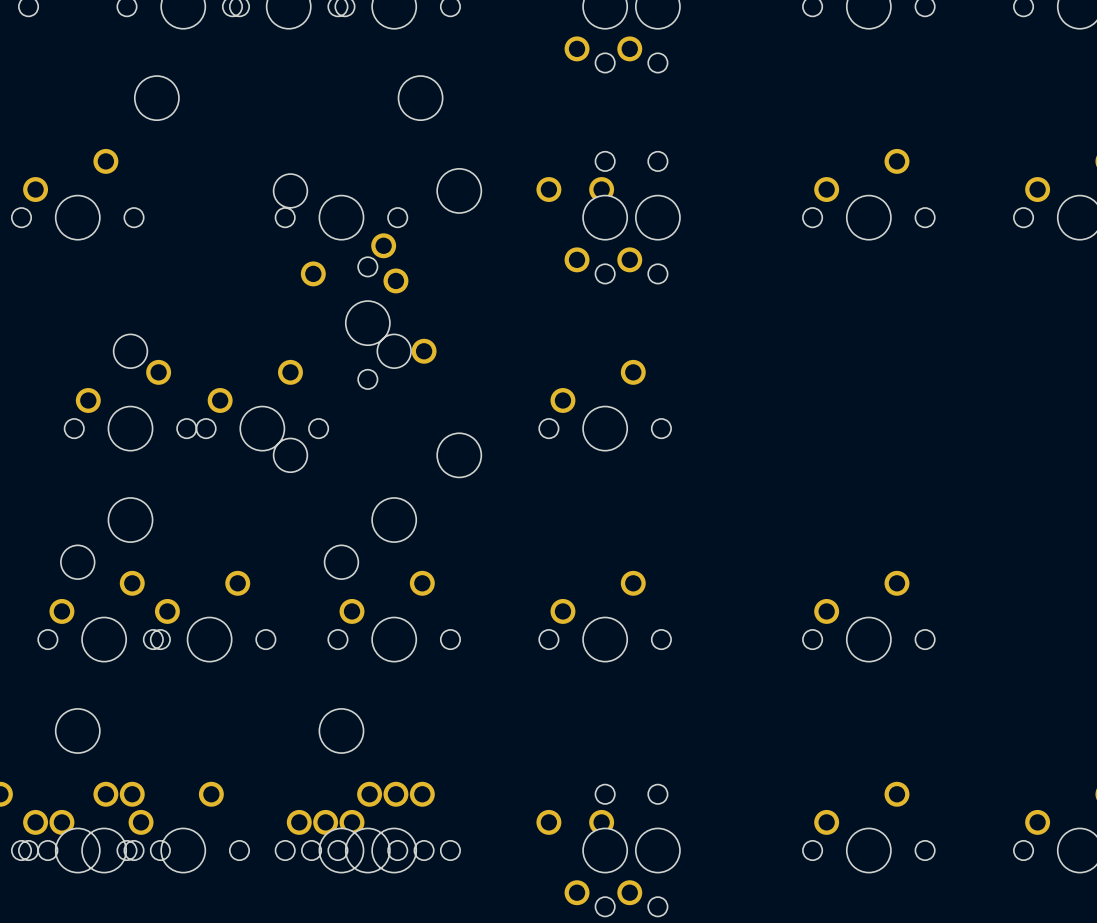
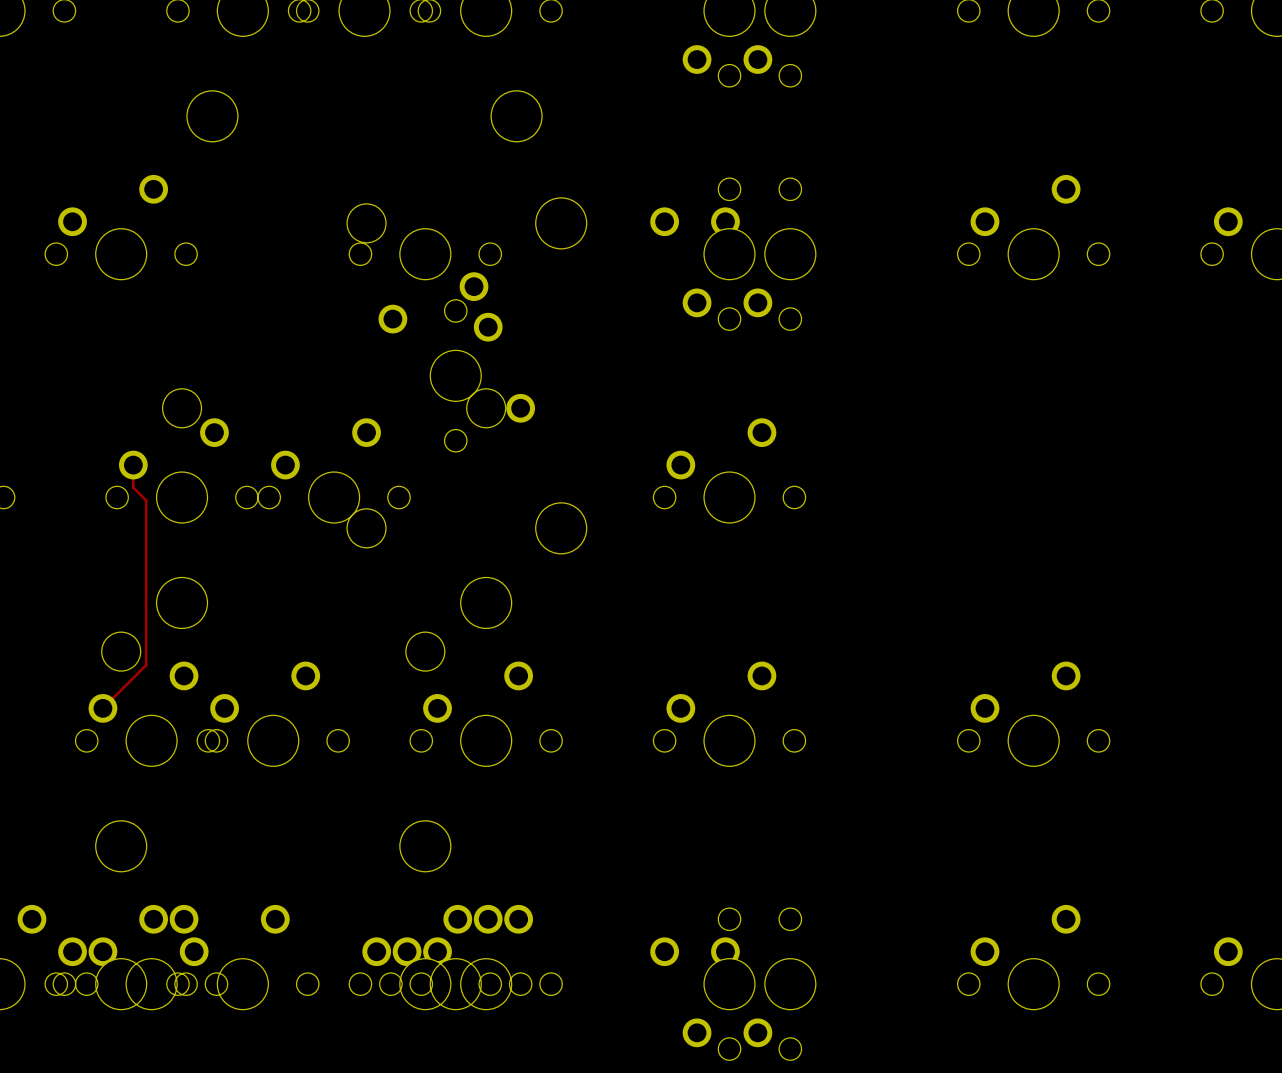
track: none -> (133, 465) (133, 487) (146, 500) (146, 665) (102, 708)

